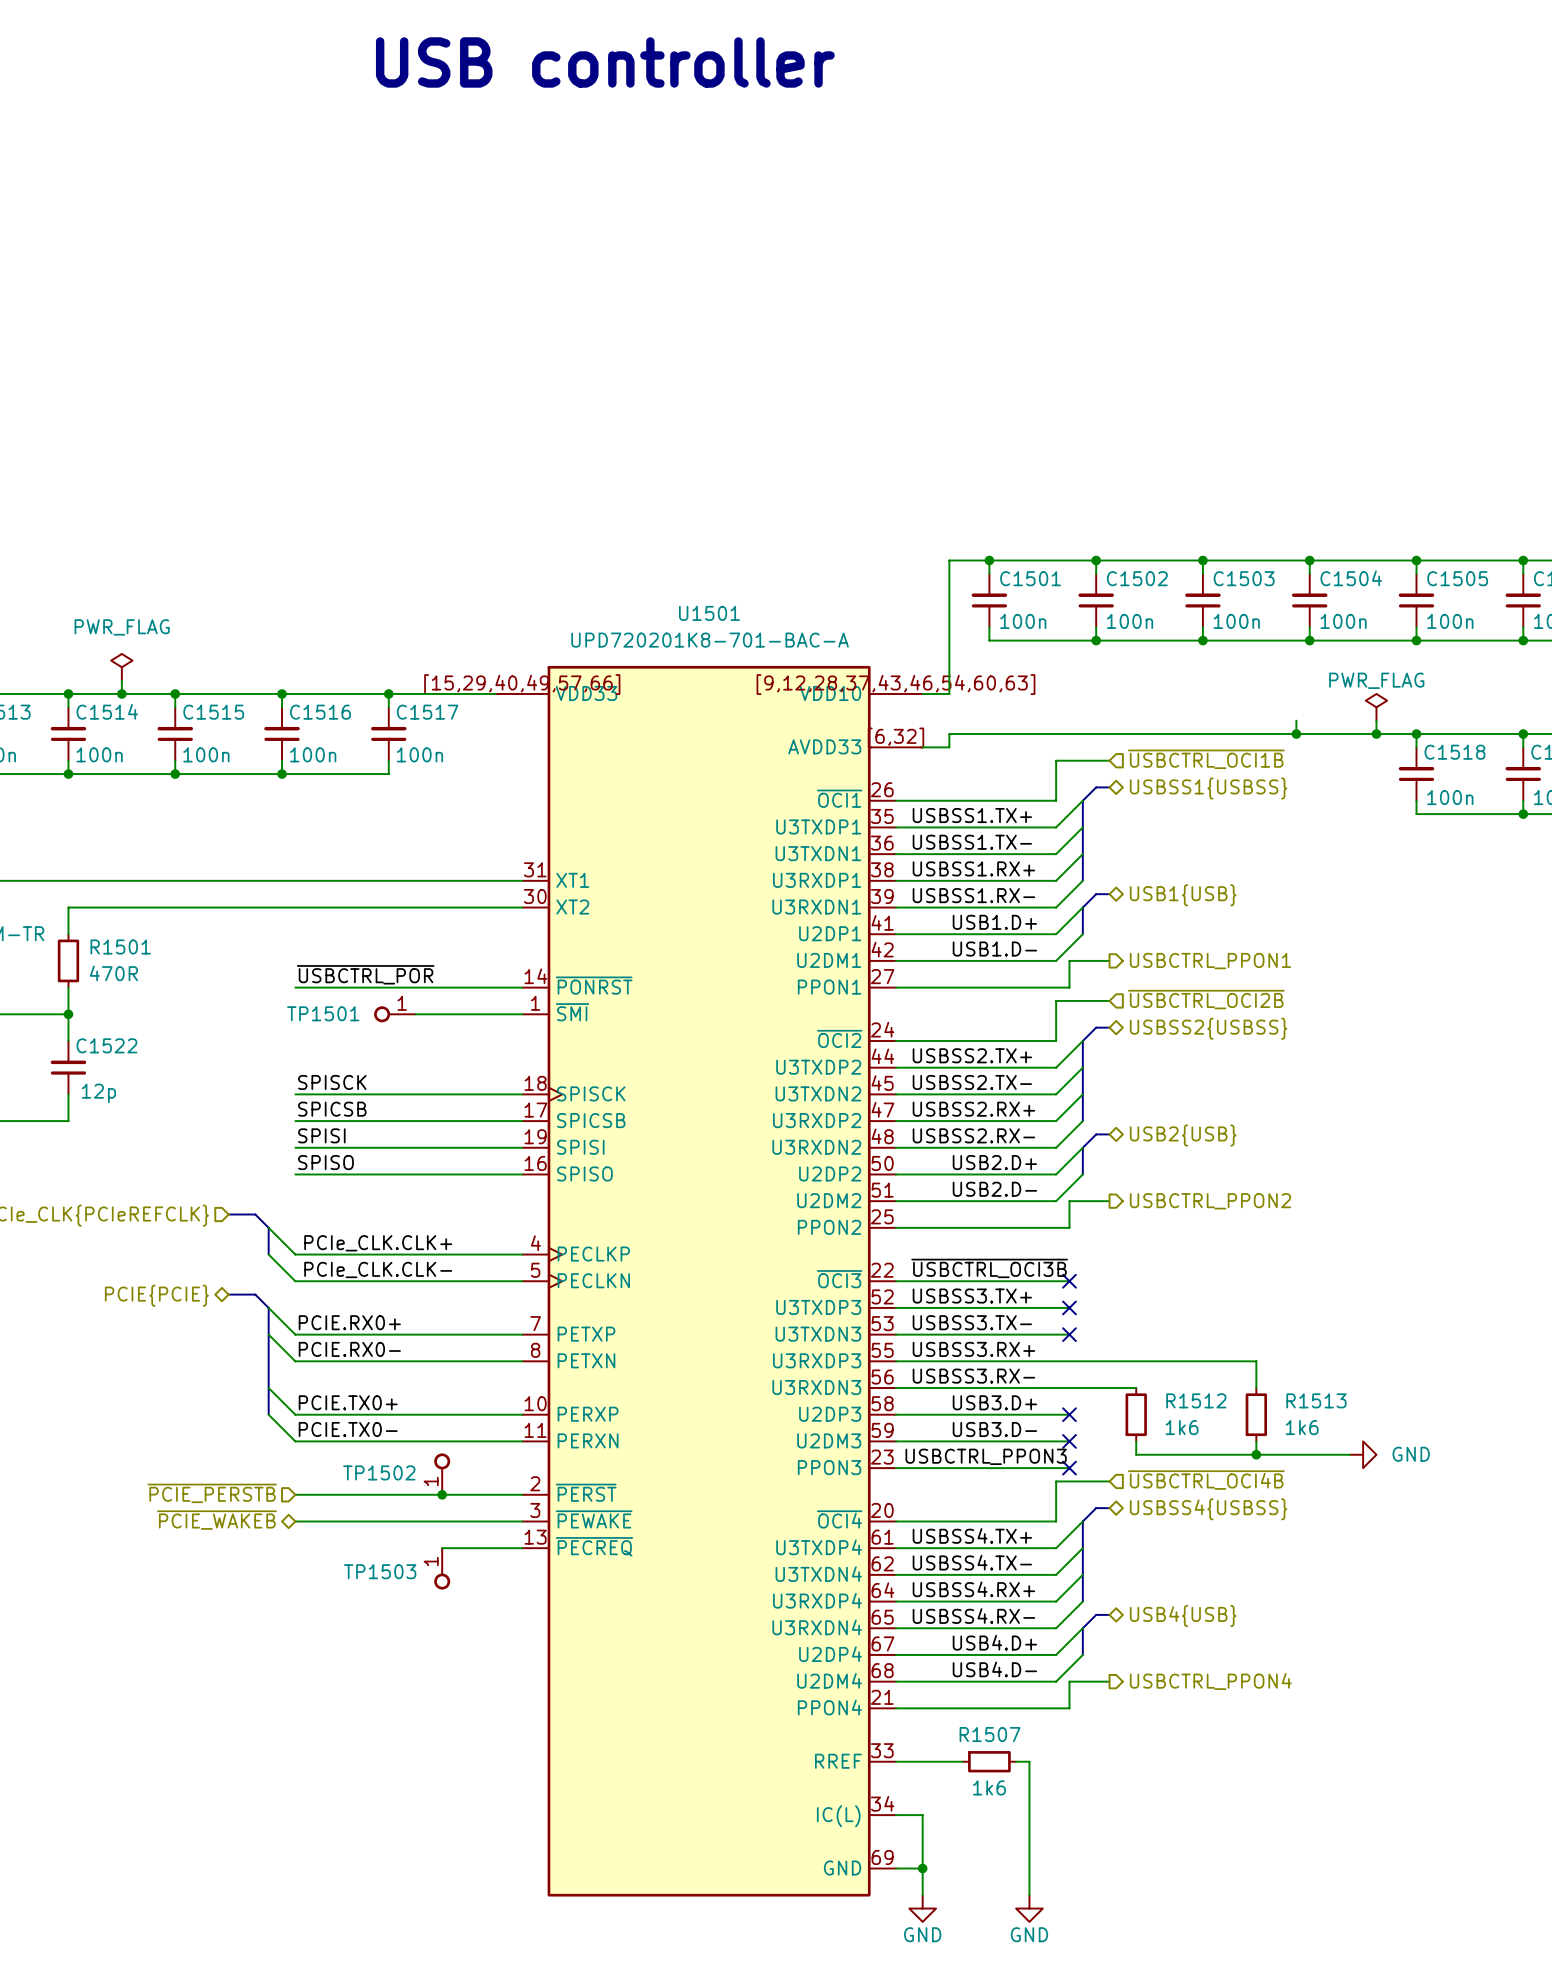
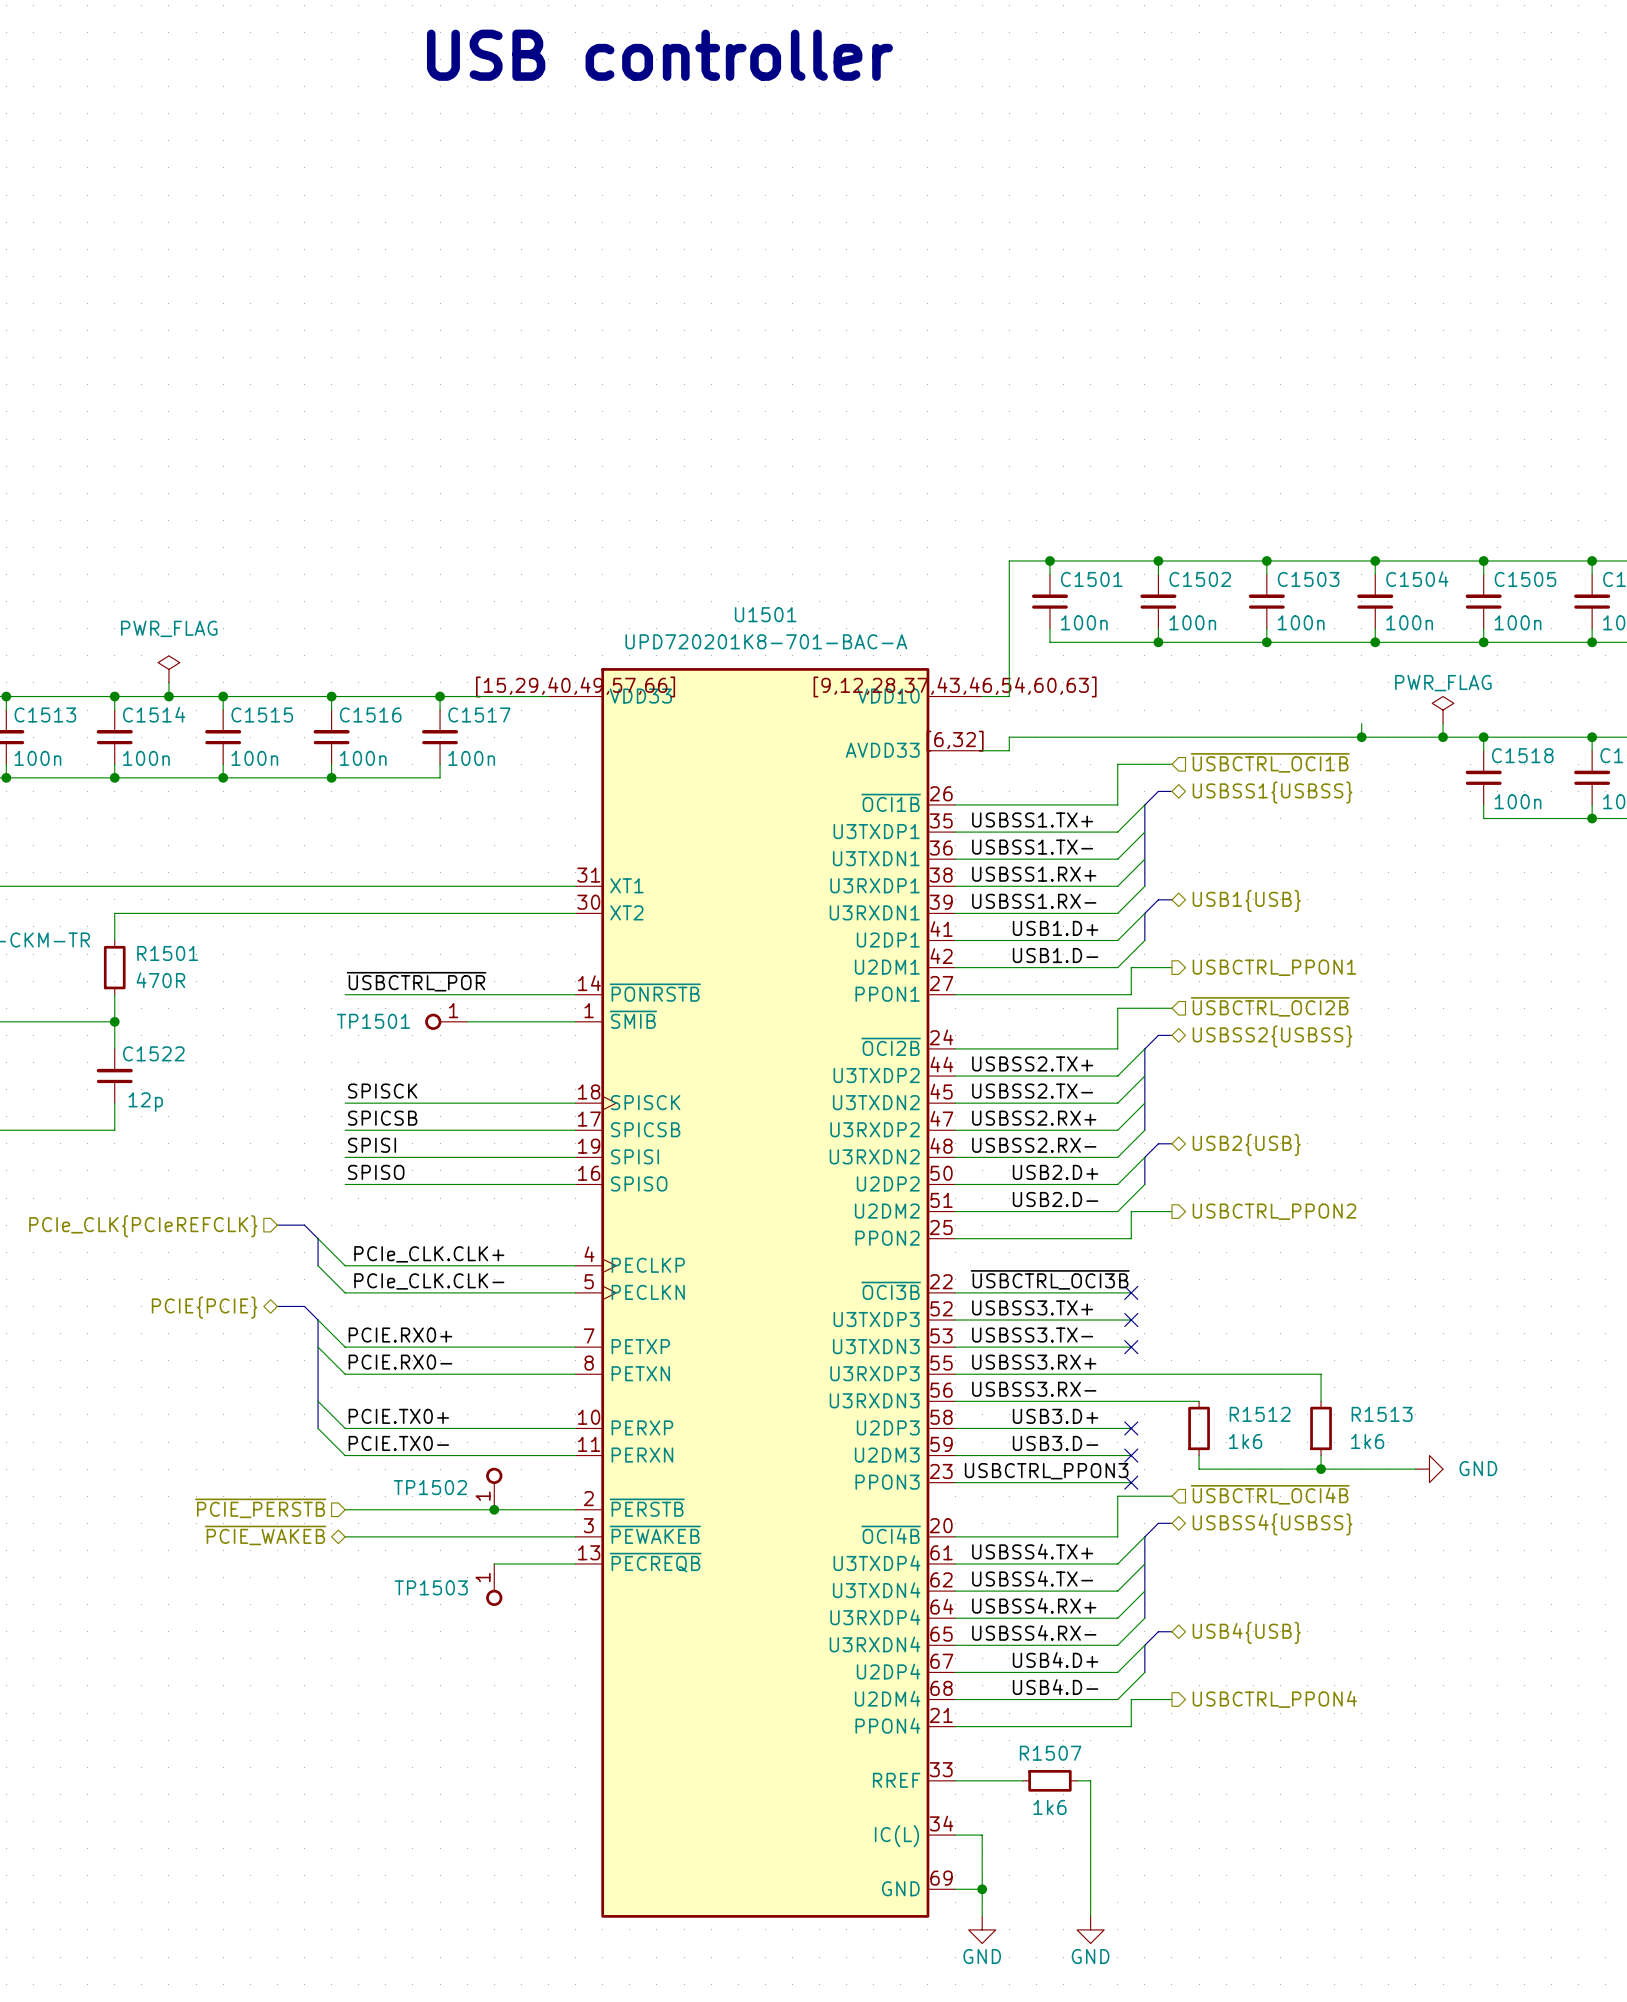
U1501 symbol: [495, 665, 923, 1897] -> [548, 668, 983, 1918]

